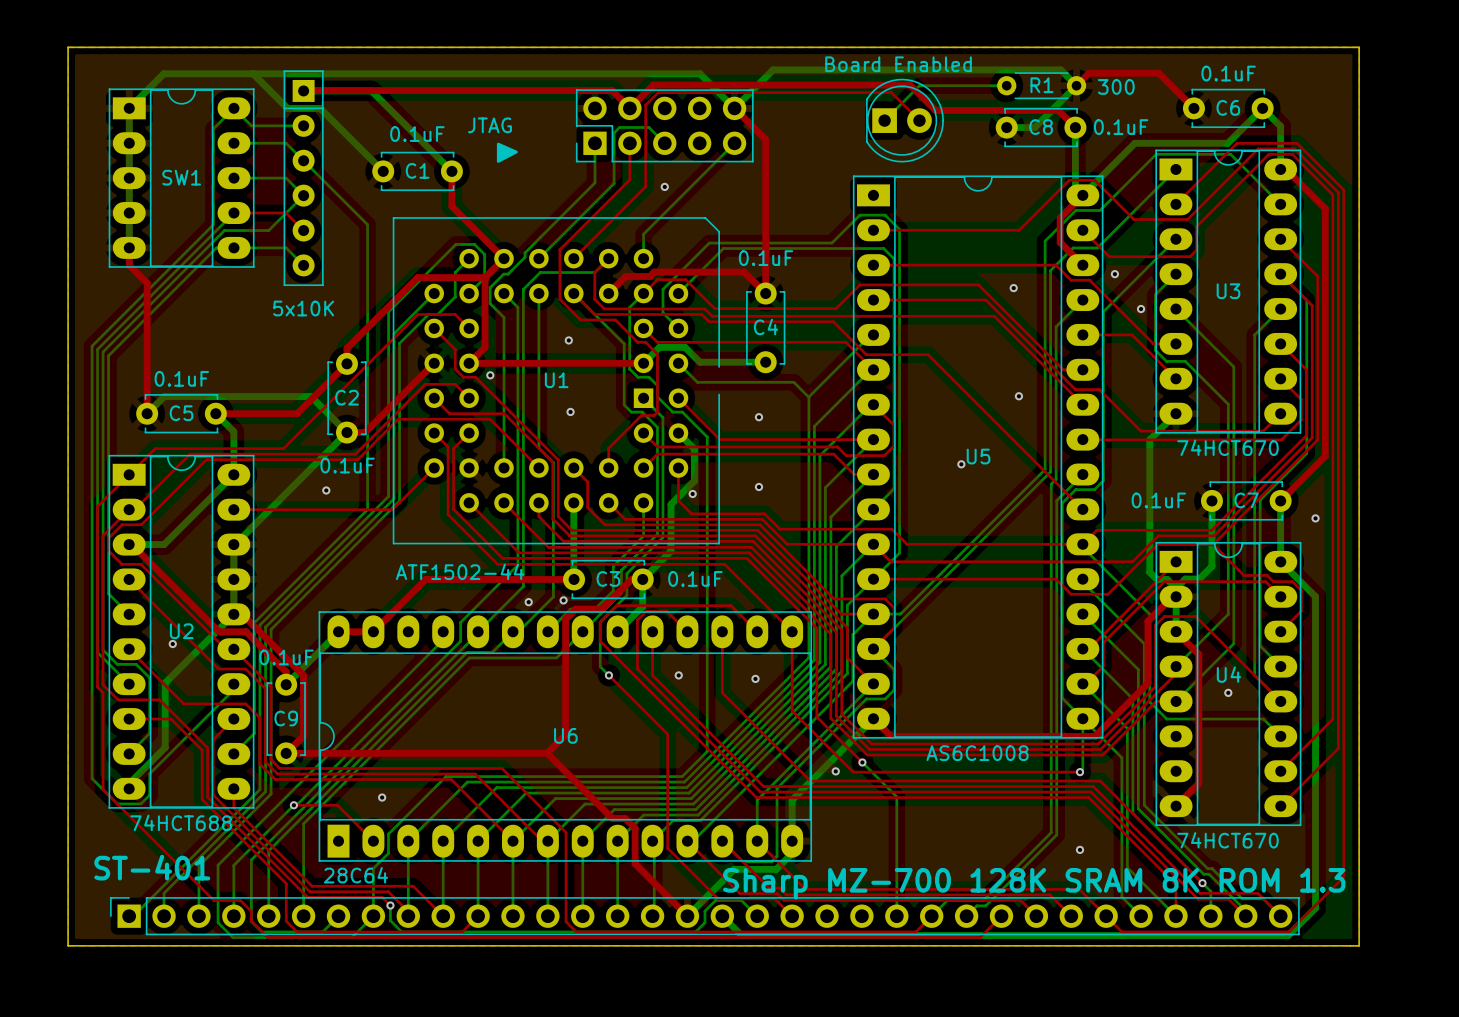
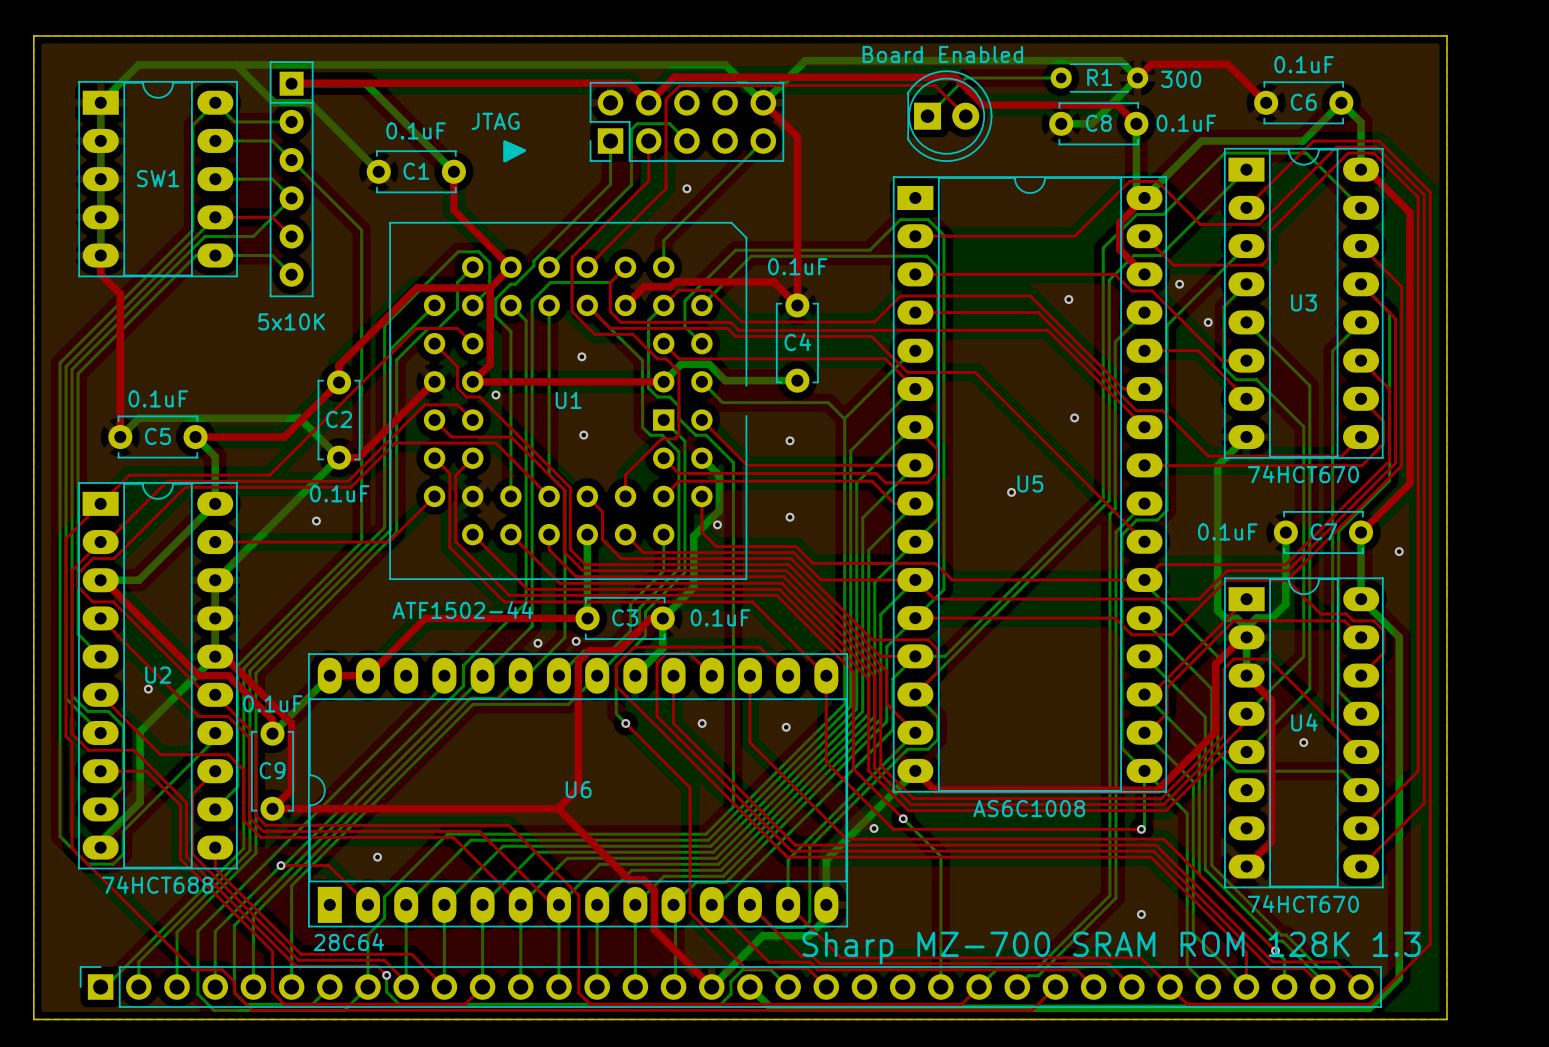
text: ST-401 (152, 867) -> none
text: Sharp MZ-700 128K SRAM 8K ROM 1.3 (1034, 883) -> Sharp MZ-700 SRAM ROM 128K 1.3 (1111, 948)

